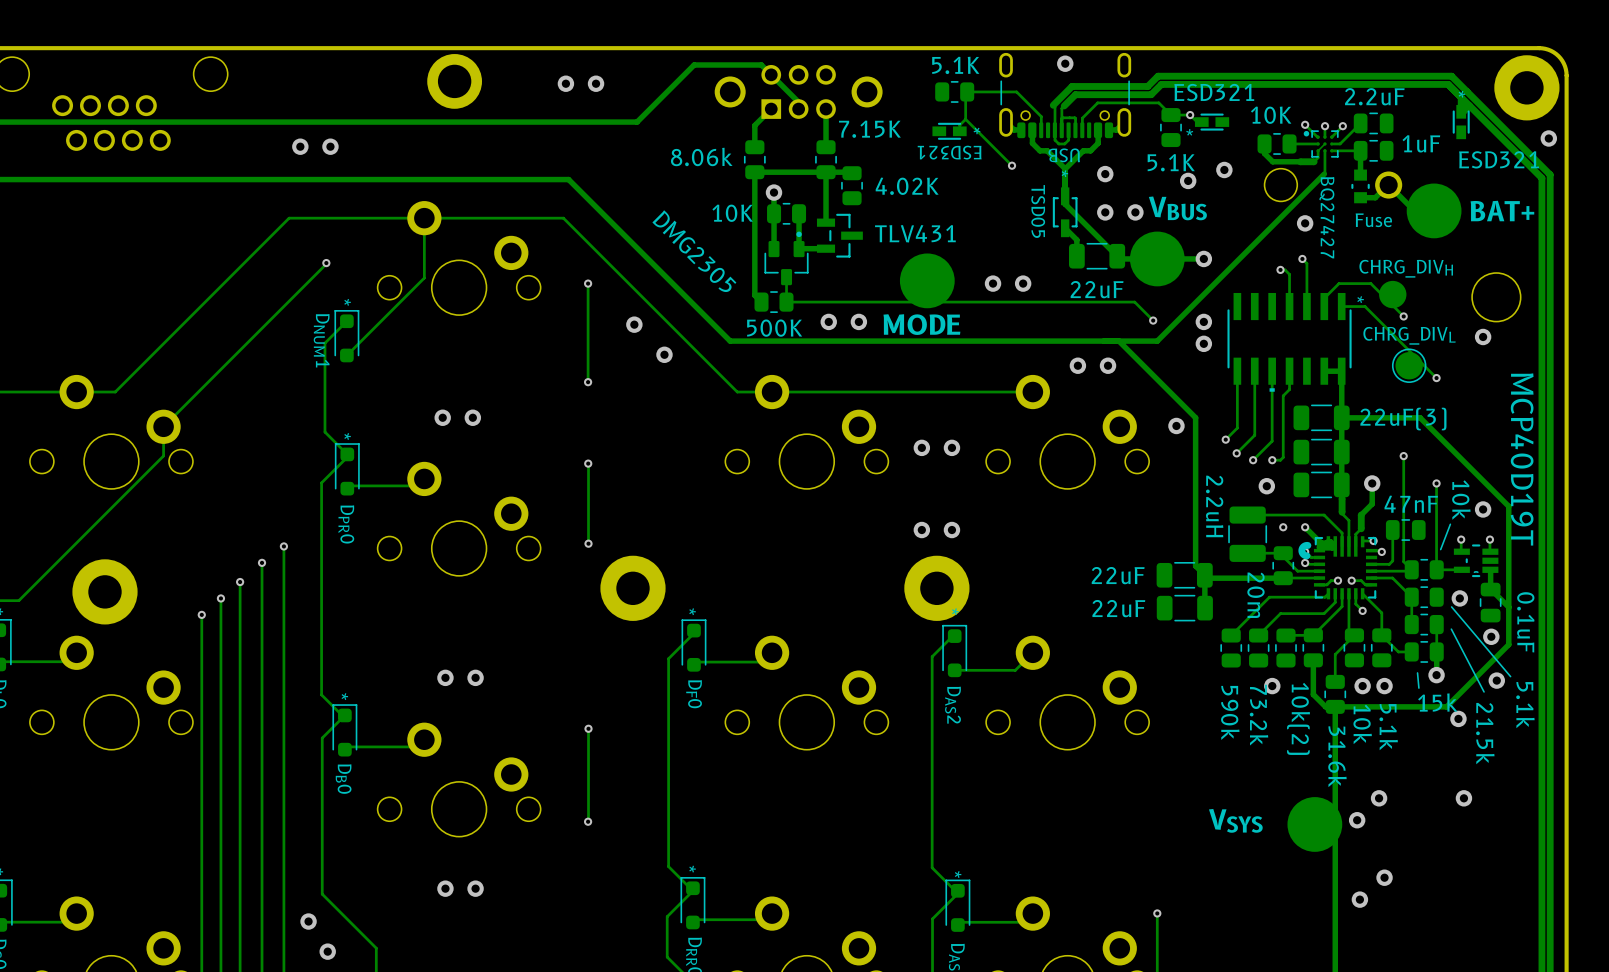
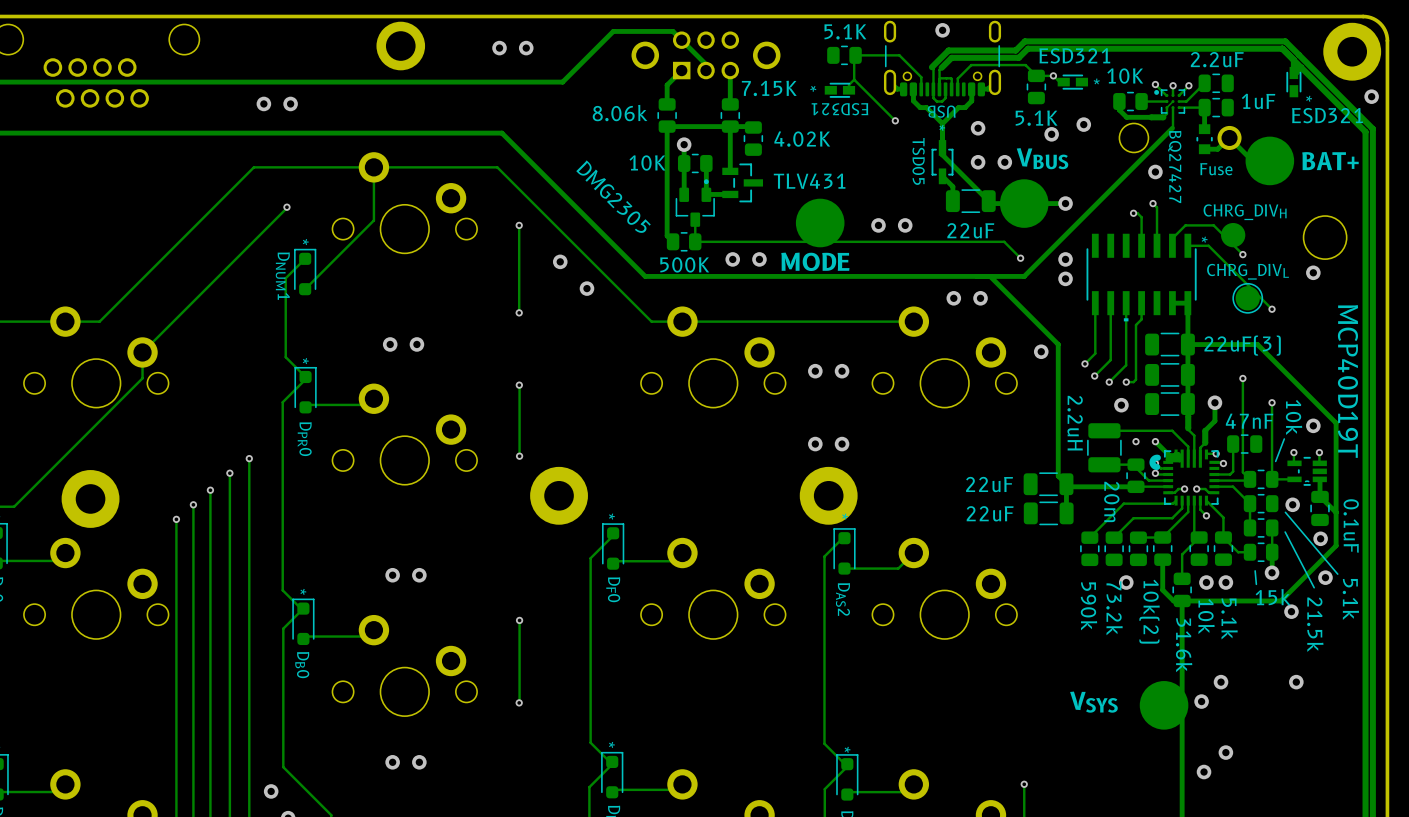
part text position: * (1461, 94) -> * (1309, 98)
part text position: * (976, 130) -> * (813, 88)
part text position: * (1189, 132) -> * (1096, 81)

